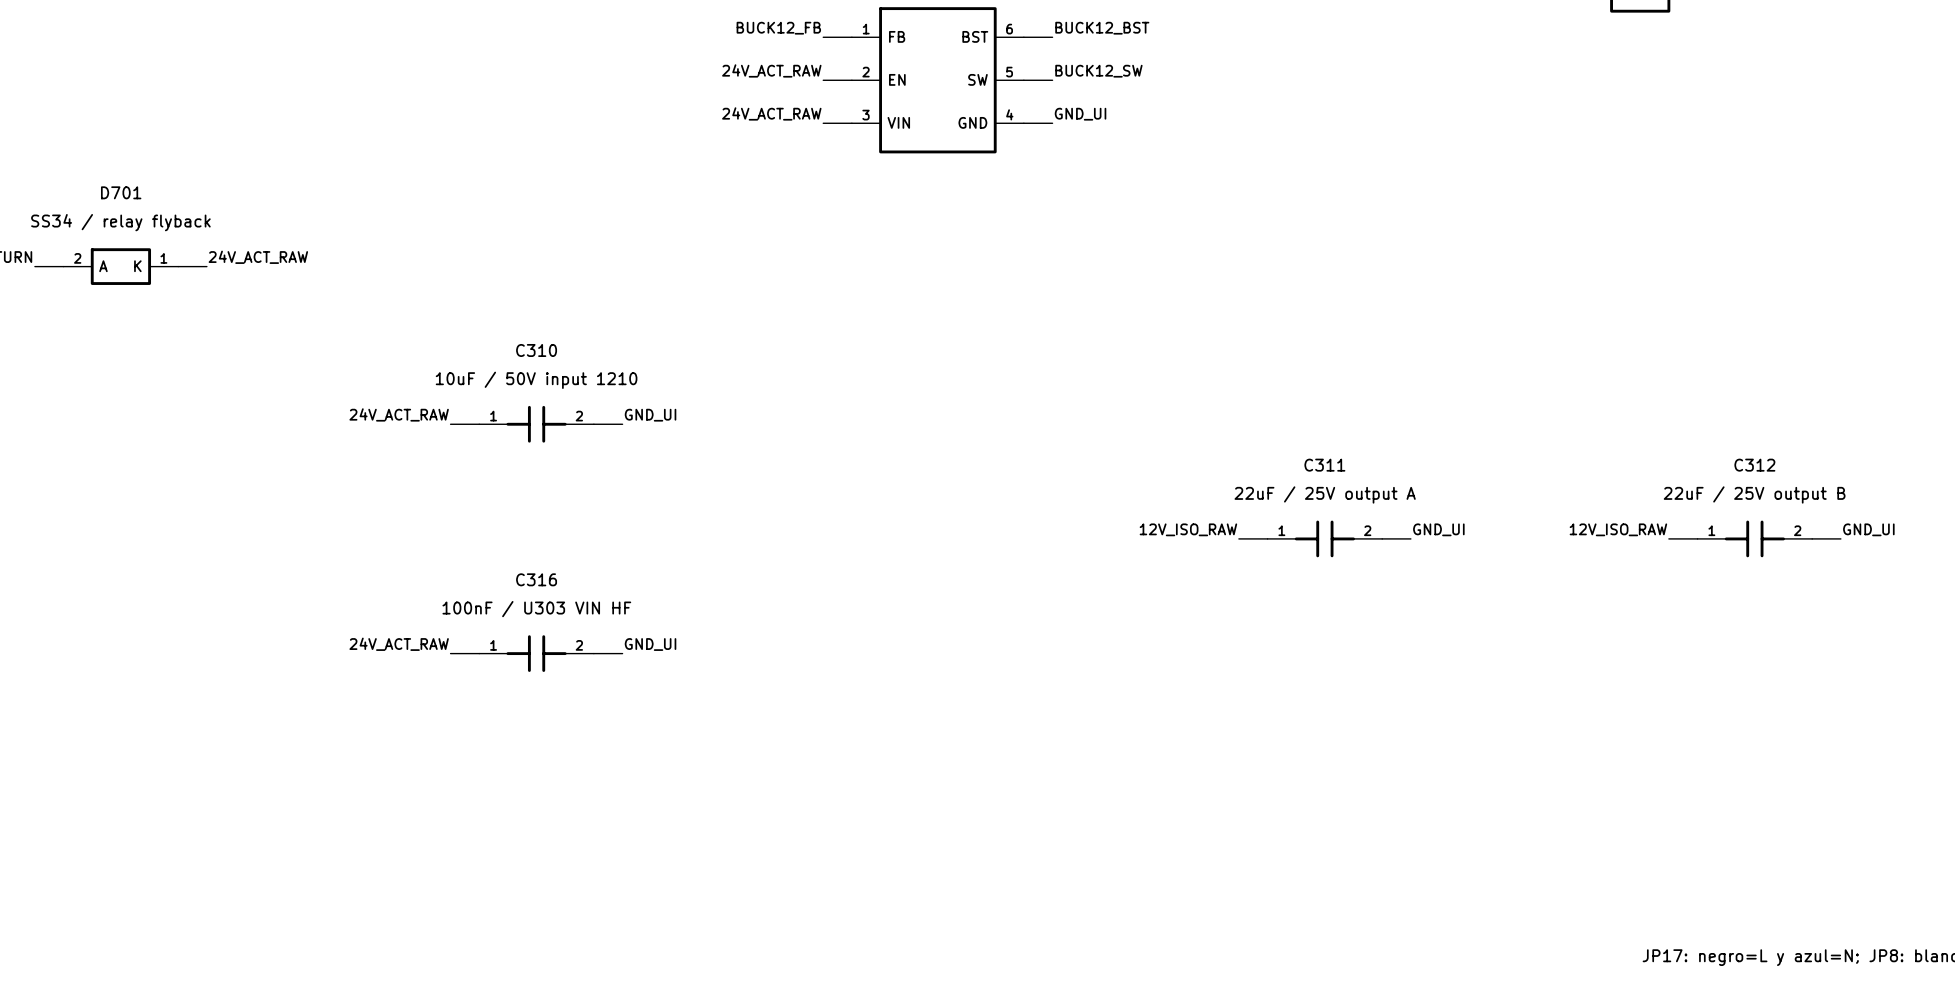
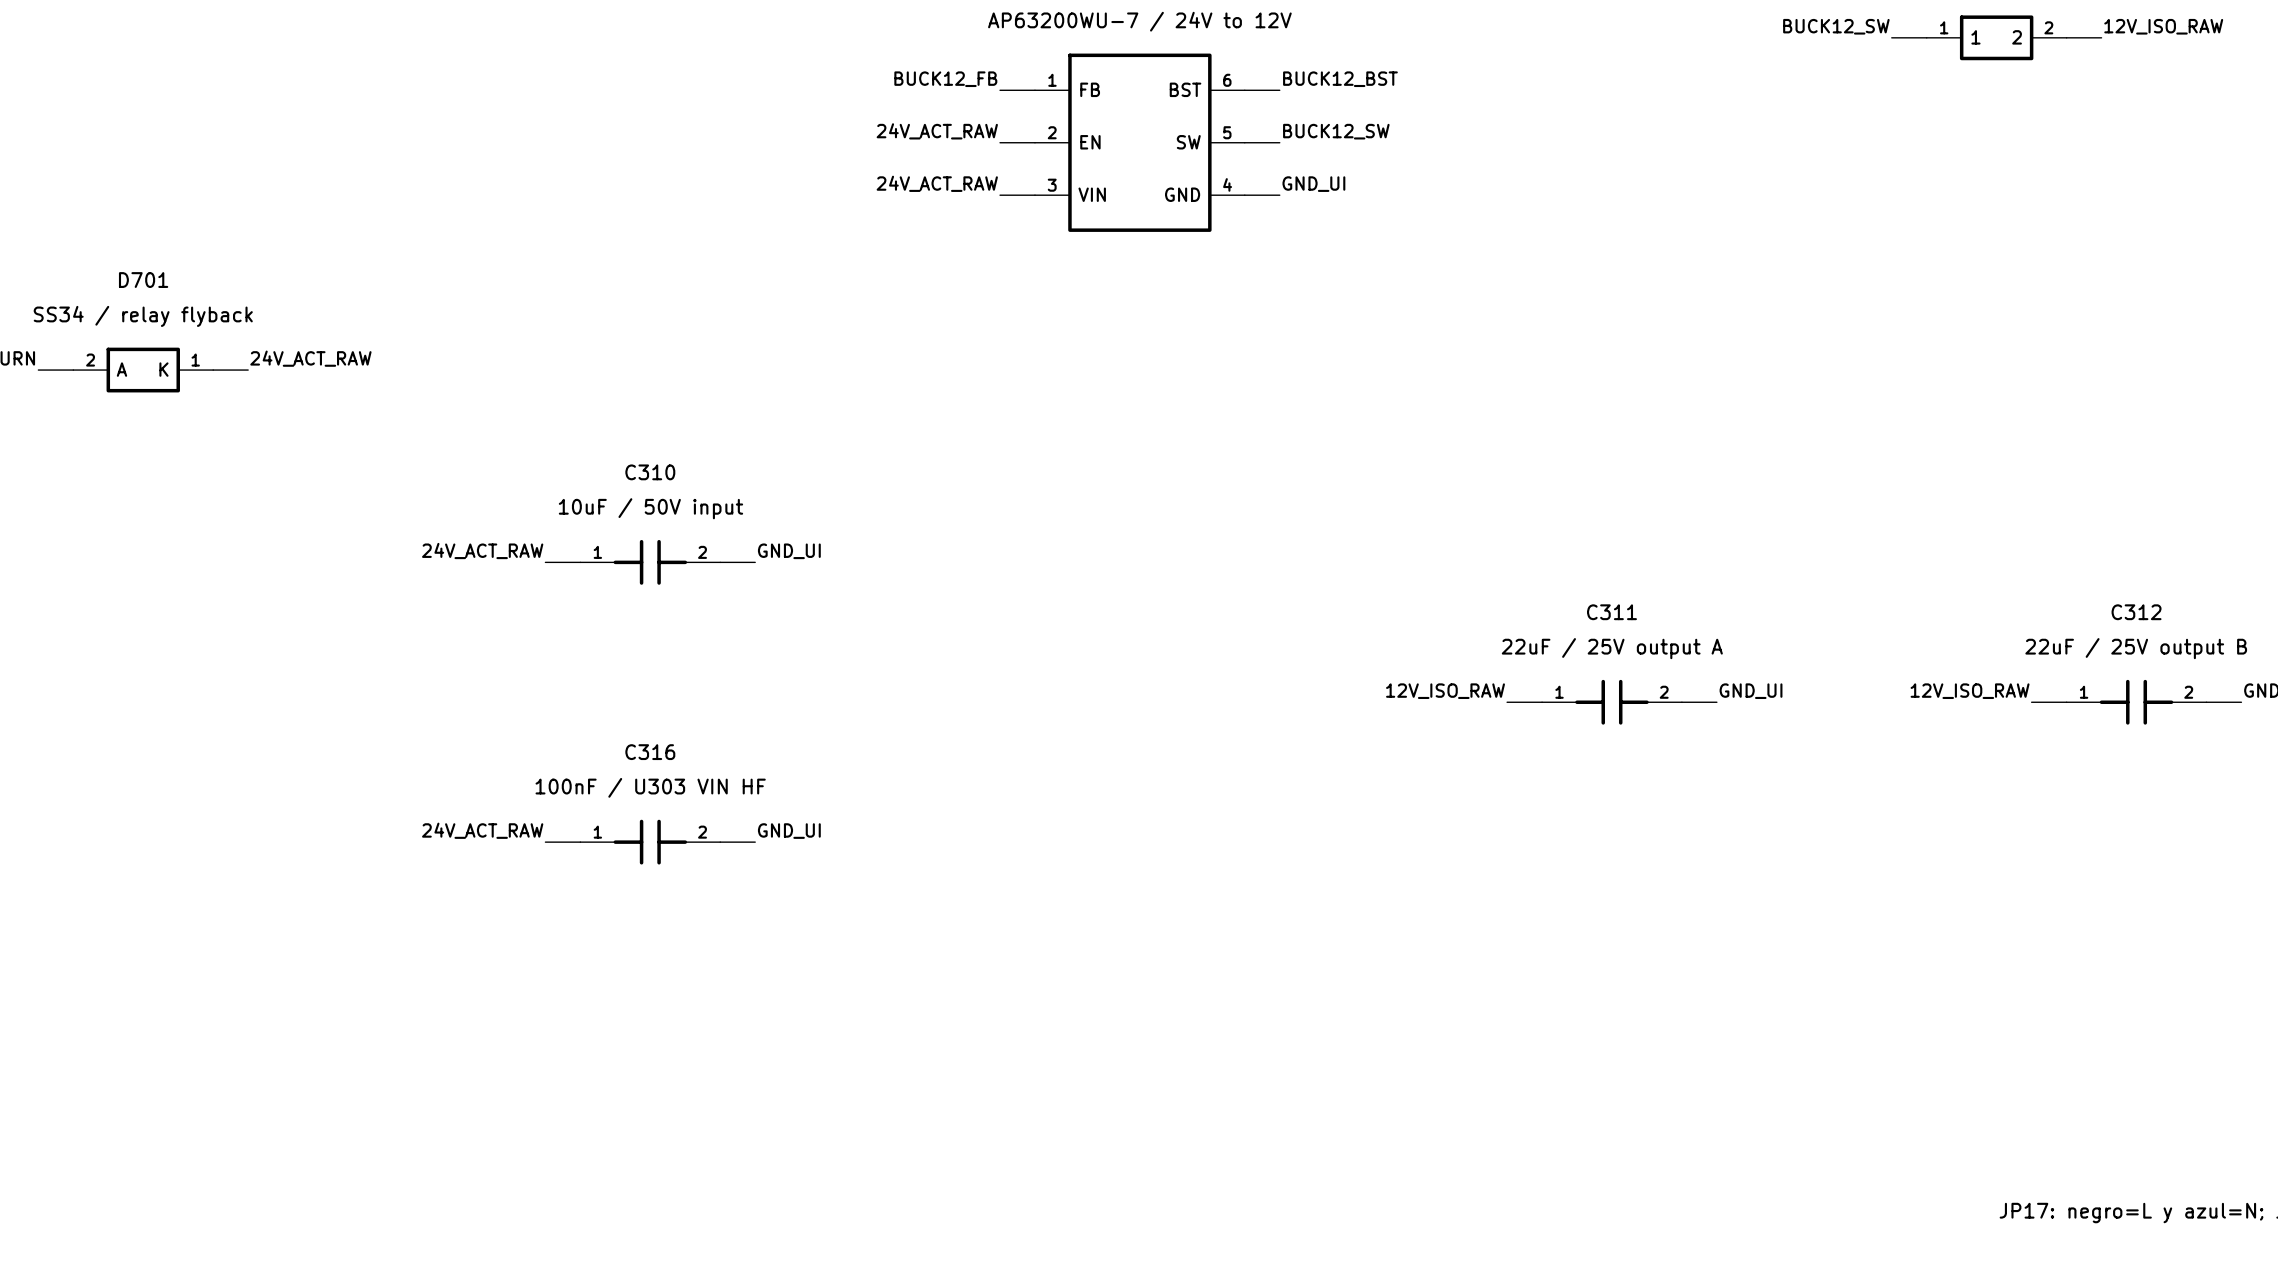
C310 value: 10uF / 50V input 1210 (536, 380) -> 10uF / 50V input (650, 508)

